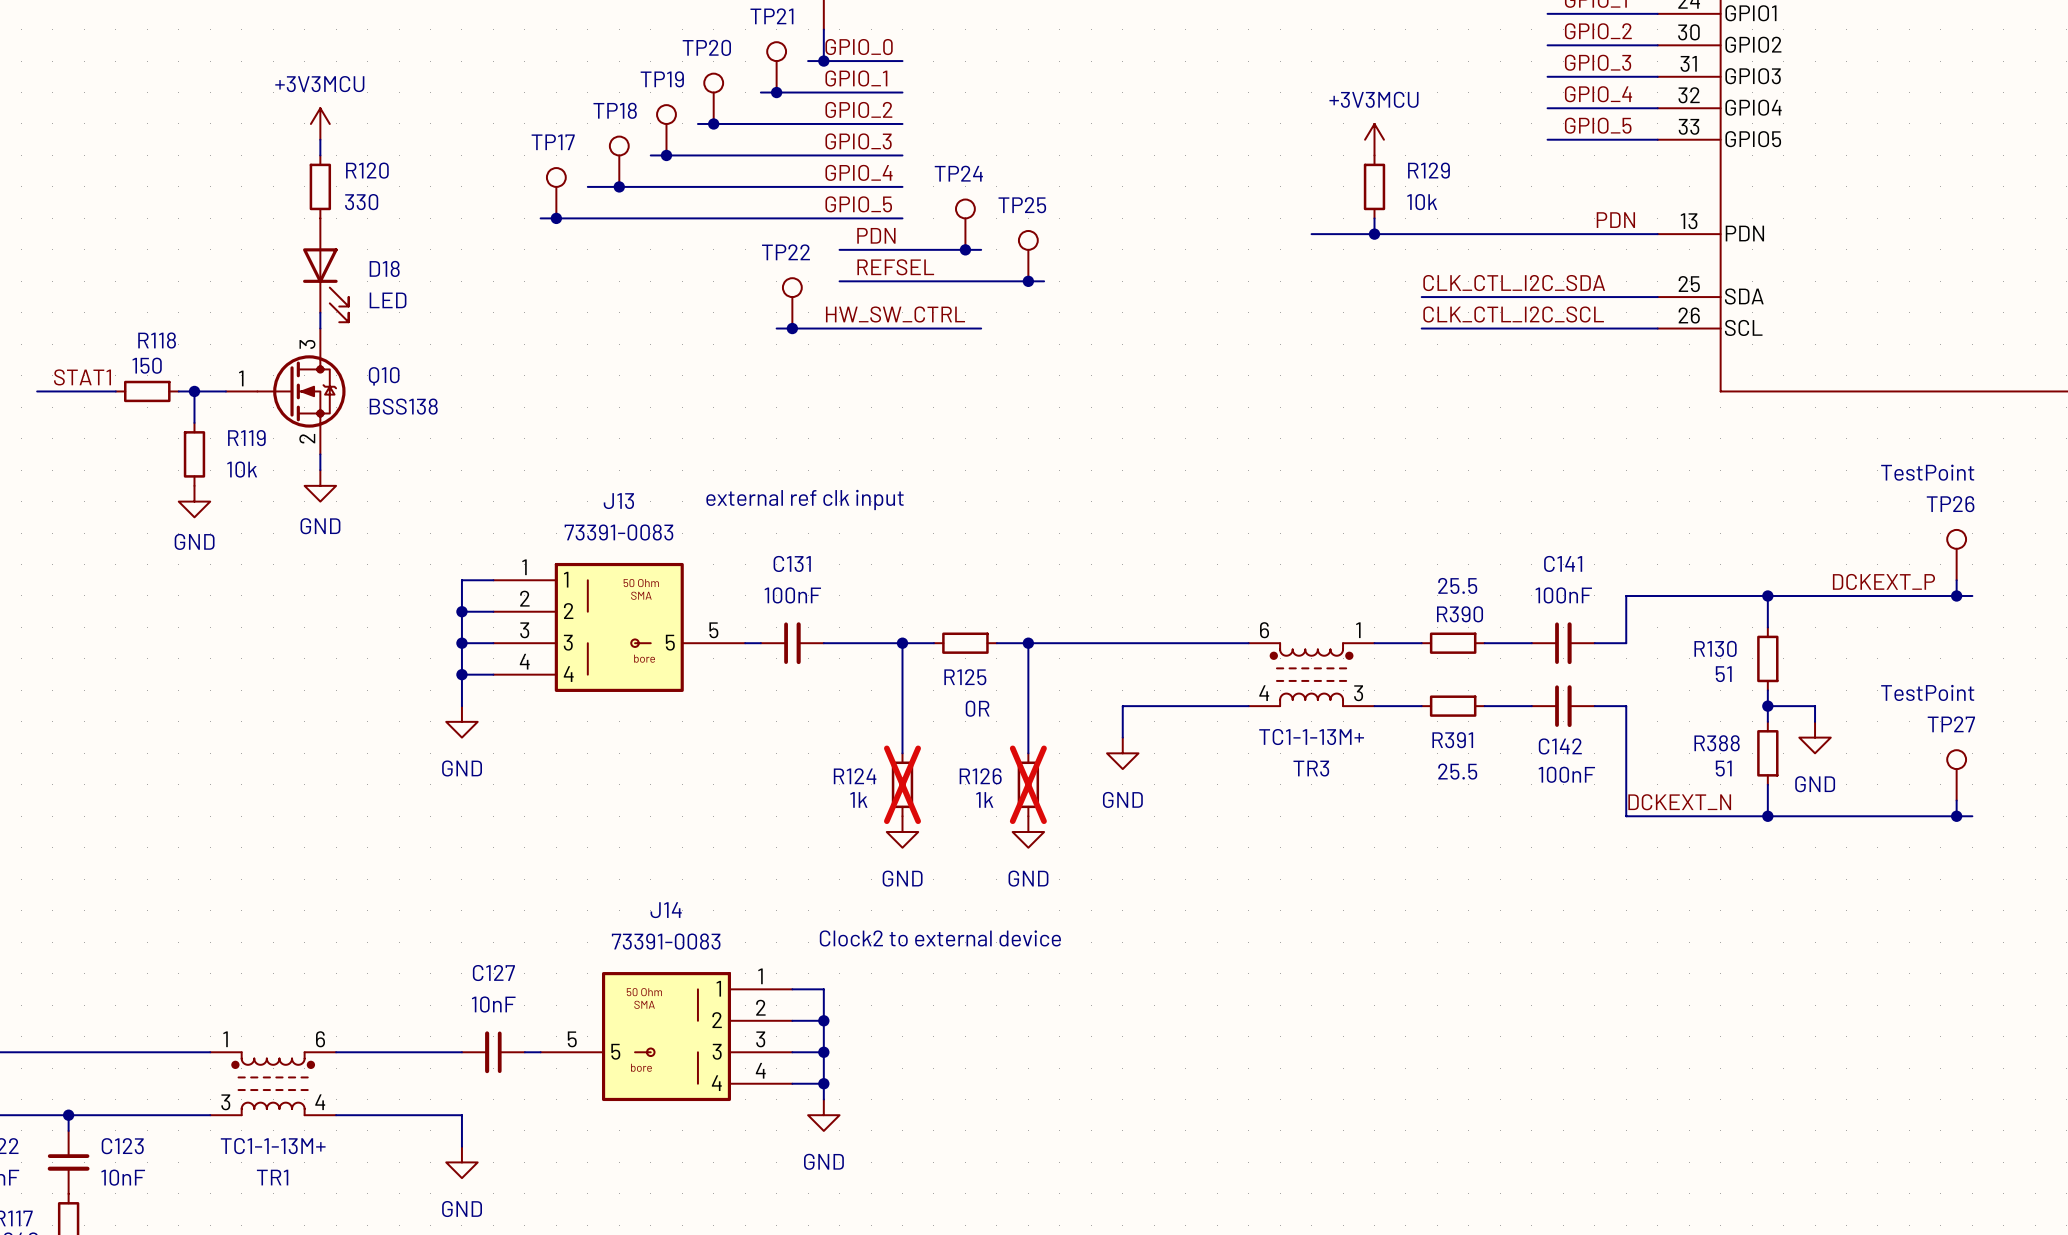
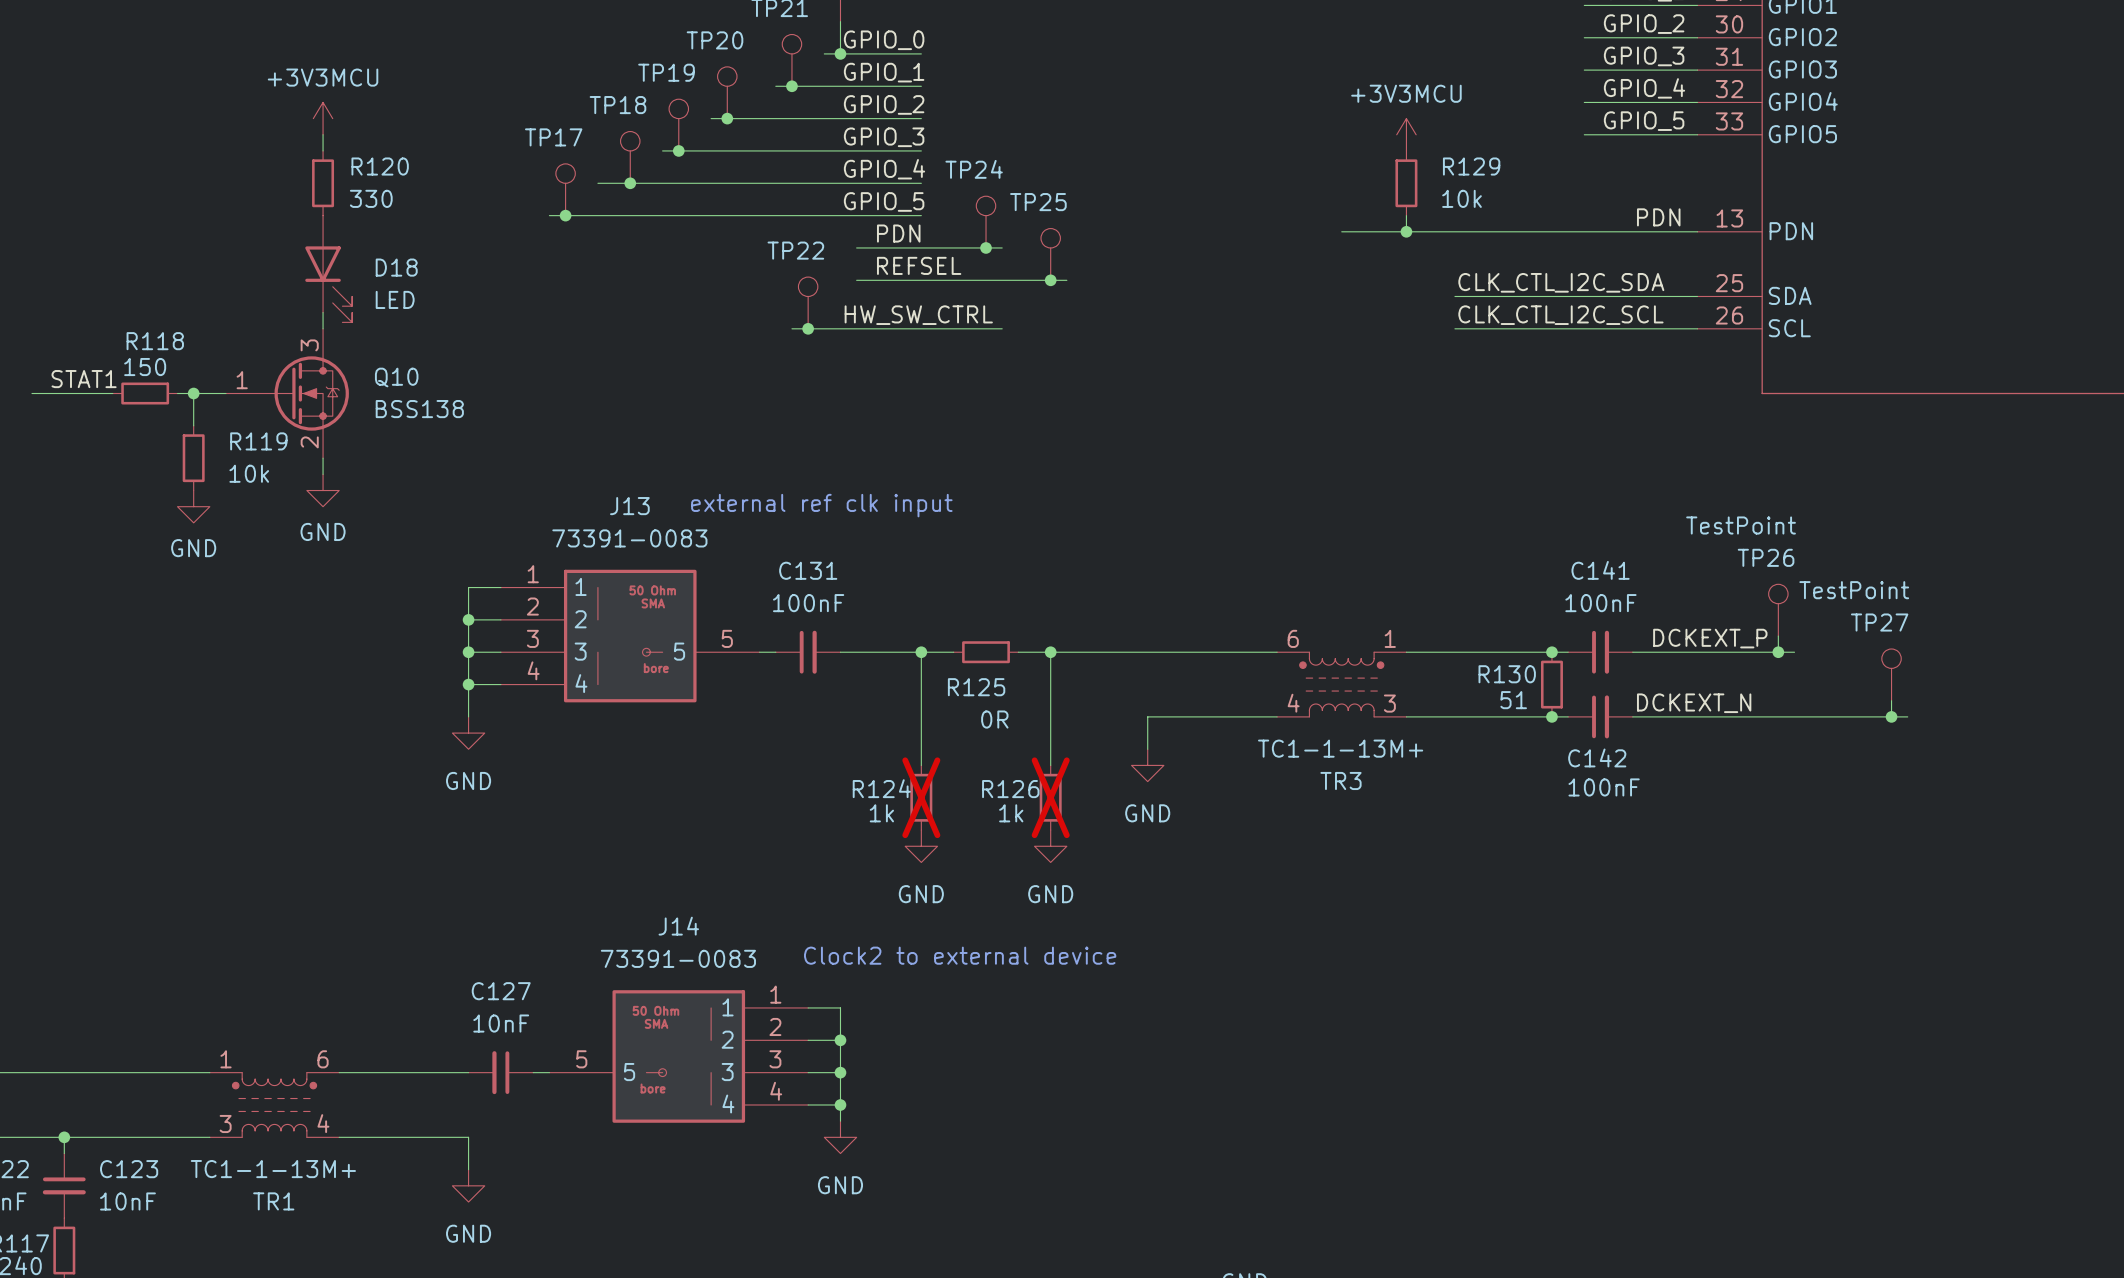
TP26 position: (1956, 555) -> (1778, 610)
wire: (1956, 580) (1956, 595) -> (1891, 700) (1891, 716)
label position: DCKEXT_P (1883, 581) -> DCKEXT_P (1710, 638)
wire: (1767, 595) (1767, 627) -> none
junction: (1767, 595) -> none
junction: (1956, 595) -> none
wire: (1972, 595) (1626, 595) (1626, 643) -> (1794, 652) (1665, 652)
wire: none -> (1454, 652) (1519, 652)
R390: 25.5 (1453, 643) -> none
junction: none -> (1551, 652)
junction: none -> (1778, 652)
R130 position: (1767, 658) -> (1551, 684)
wire: (1767, 690) (1767, 721) -> none
wire: none -> (1454, 716) (1519, 716)
R391: 25.5 (1453, 706) -> none
junction: none -> (1551, 716)
wire: (1626, 706) (1626, 816) (1972, 816) -> (1665, 716) (1810, 716)
junction: (1767, 706) -> none
wire: (1815, 706) (1815, 721) -> (1859, 716) (1907, 716)
junction: none -> (1891, 716)
power symbol: GND (1815, 737) -> none
R388: 51 (1767, 753) -> none
TP27 position: (1956, 775) -> (1891, 674)
wire: (1767, 784) (1767, 816) -> none
wire: (1956, 800) (1956, 816) -> (1778, 636) (1778, 652)
label position: DCKEXT_N (1679, 802) -> DCKEXT_N (1694, 703)
junction: (1767, 816) -> none
junction: (1956, 816) -> none

